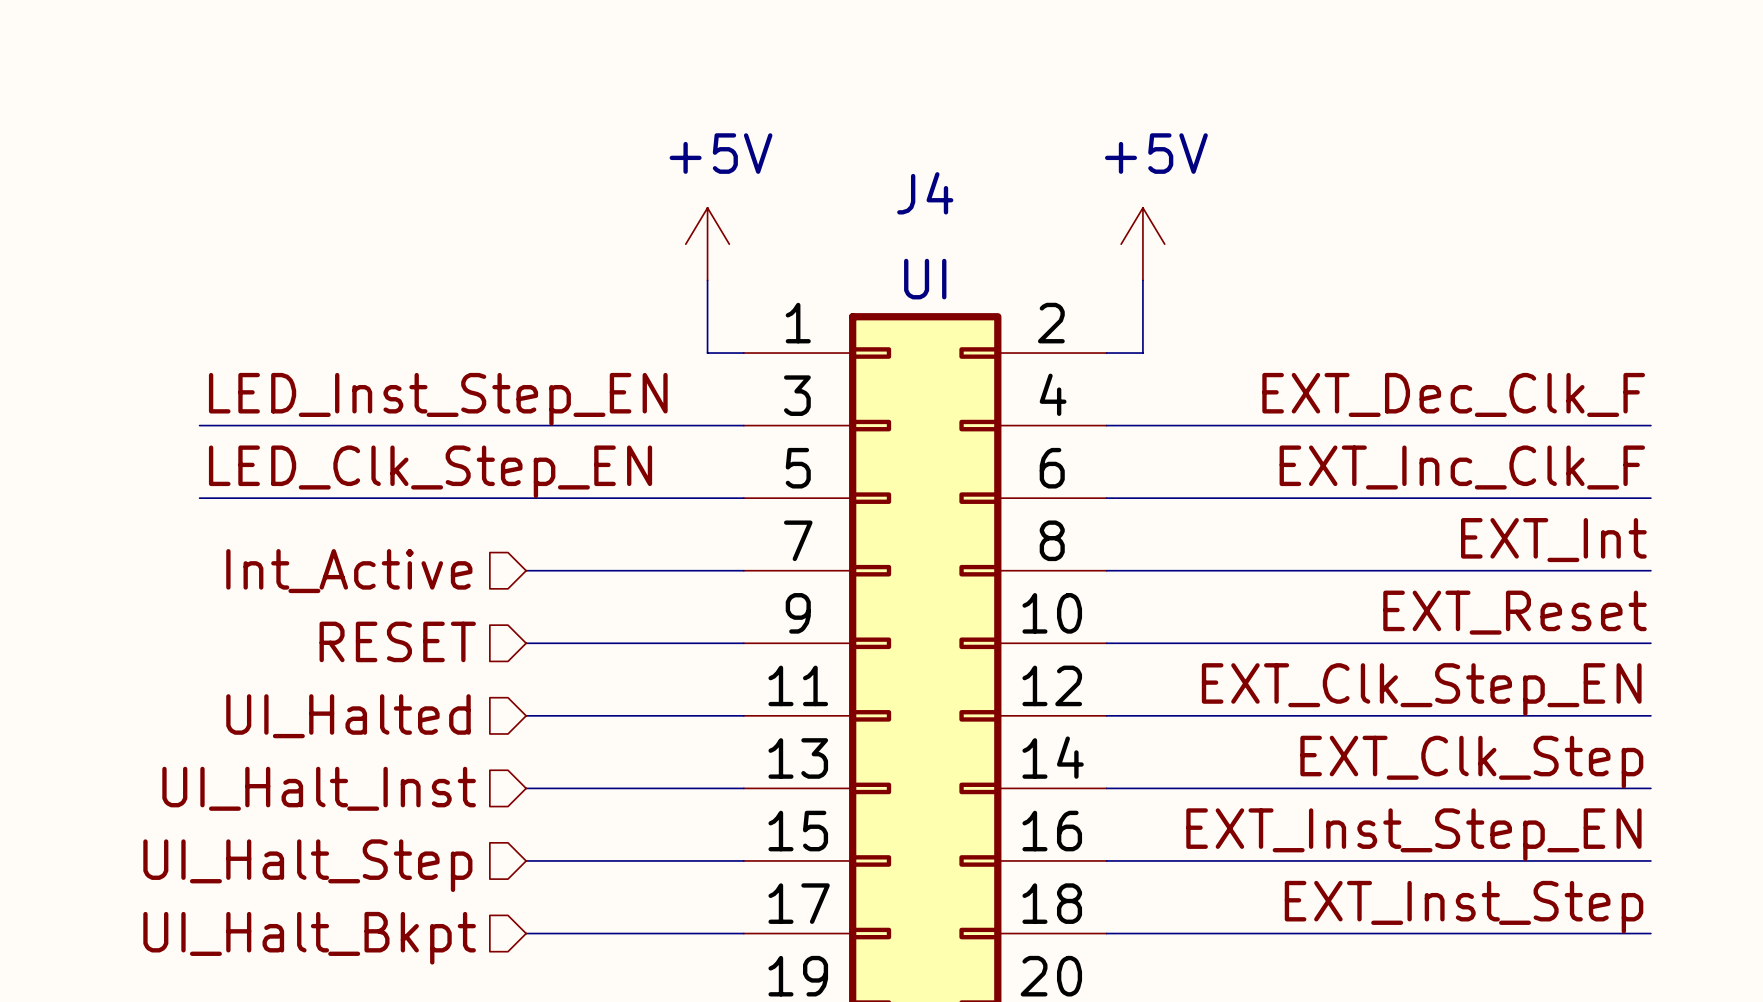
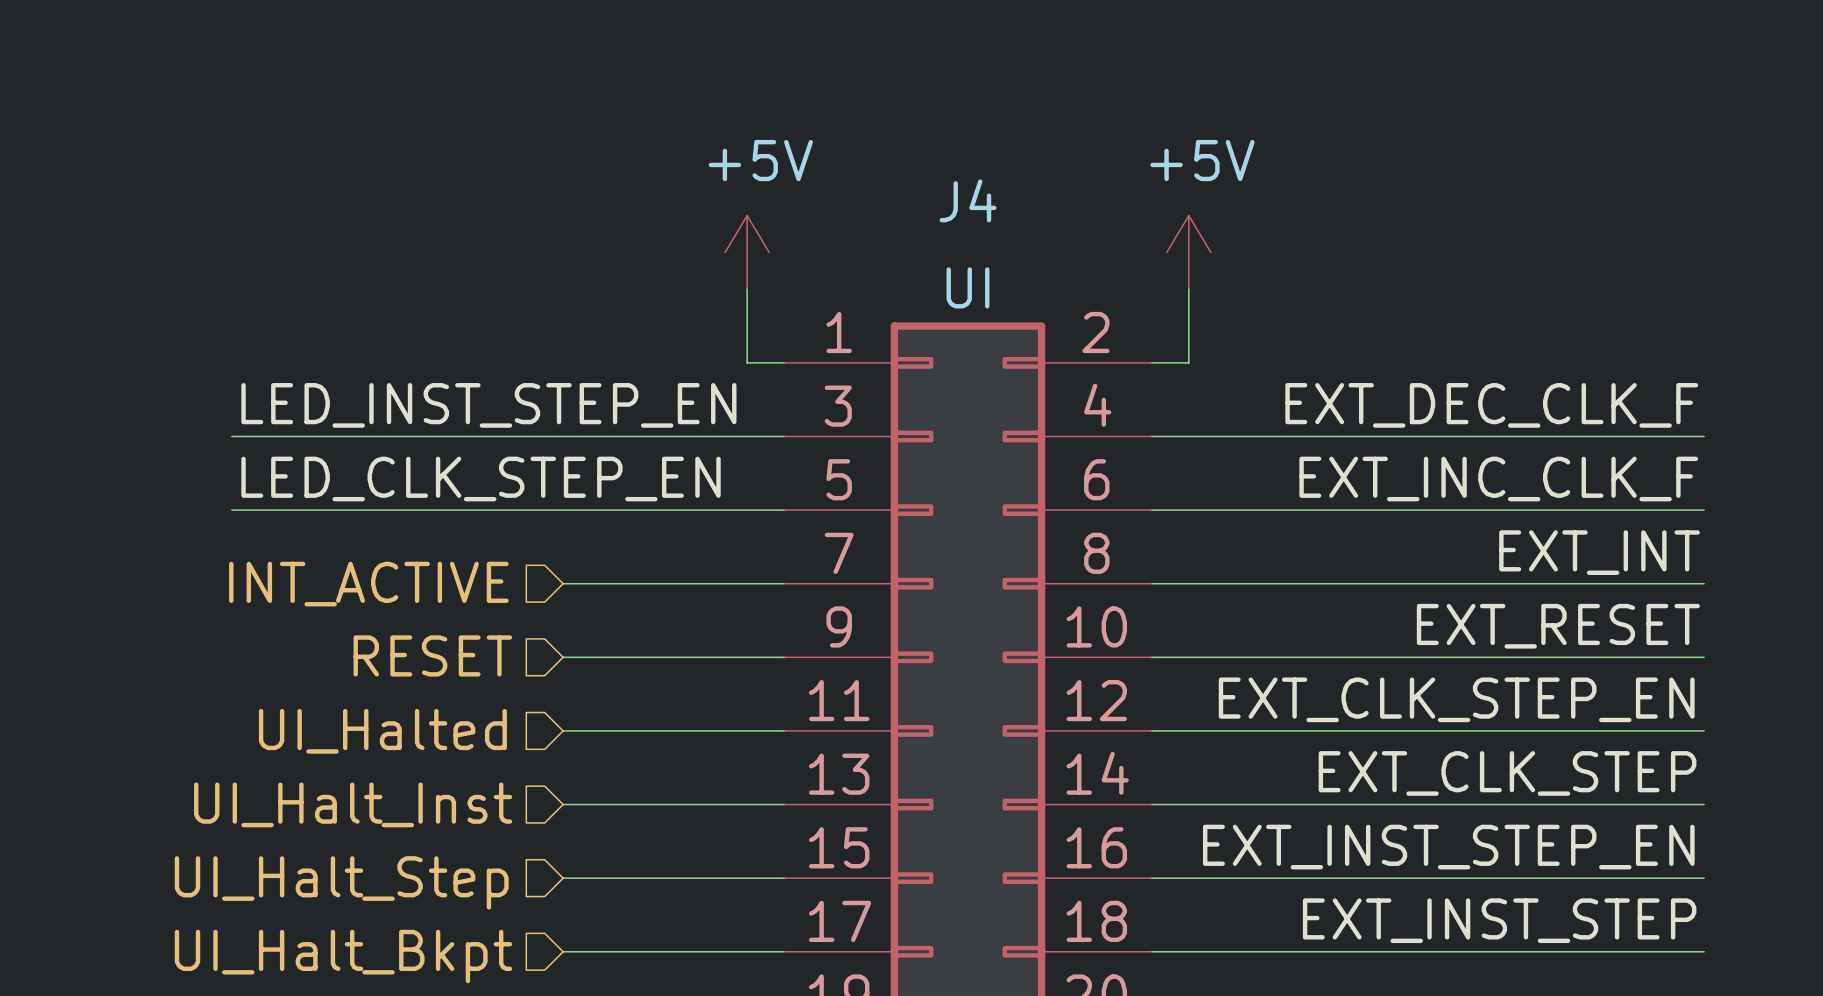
label: EXT_Dec_Clk_F (1453, 394) -> EXT_DEC_CLK_F (1491, 405)
label: LED_Inst_Step_EN (438, 399) -> LED_INST_STEP_EN (488, 405)
label: EXT_Inc_Clk_F (1462, 467) -> EXT_INC_CLK_F (1498, 479)
label: LED_Clk_Step_EN (430, 471) -> LED_CLK_STEP_EN (481, 479)
label: EXT_Int (1553, 540) -> EXT_INT (1599, 552)
hierarchical label: Int_Active (349, 571) -> INT_ACTIVE (368, 584)
label: EXT_Reset (1515, 612) -> EXT_RESET (1558, 626)
label: EXT_Clk_Step_EN (1421, 689) -> EXT_CLK_STEP_EN (1456, 699)
label: EXT_Clk_Step (1471, 762) -> EXT_CLK_STEP (1507, 773)
label: EXT_Inst_Step_EN (1413, 834) -> EXT_INST_STEP_EN (1448, 847)
label: EXT_Inst_Step (1464, 907) -> EXT_INST_STEP (1499, 920)

